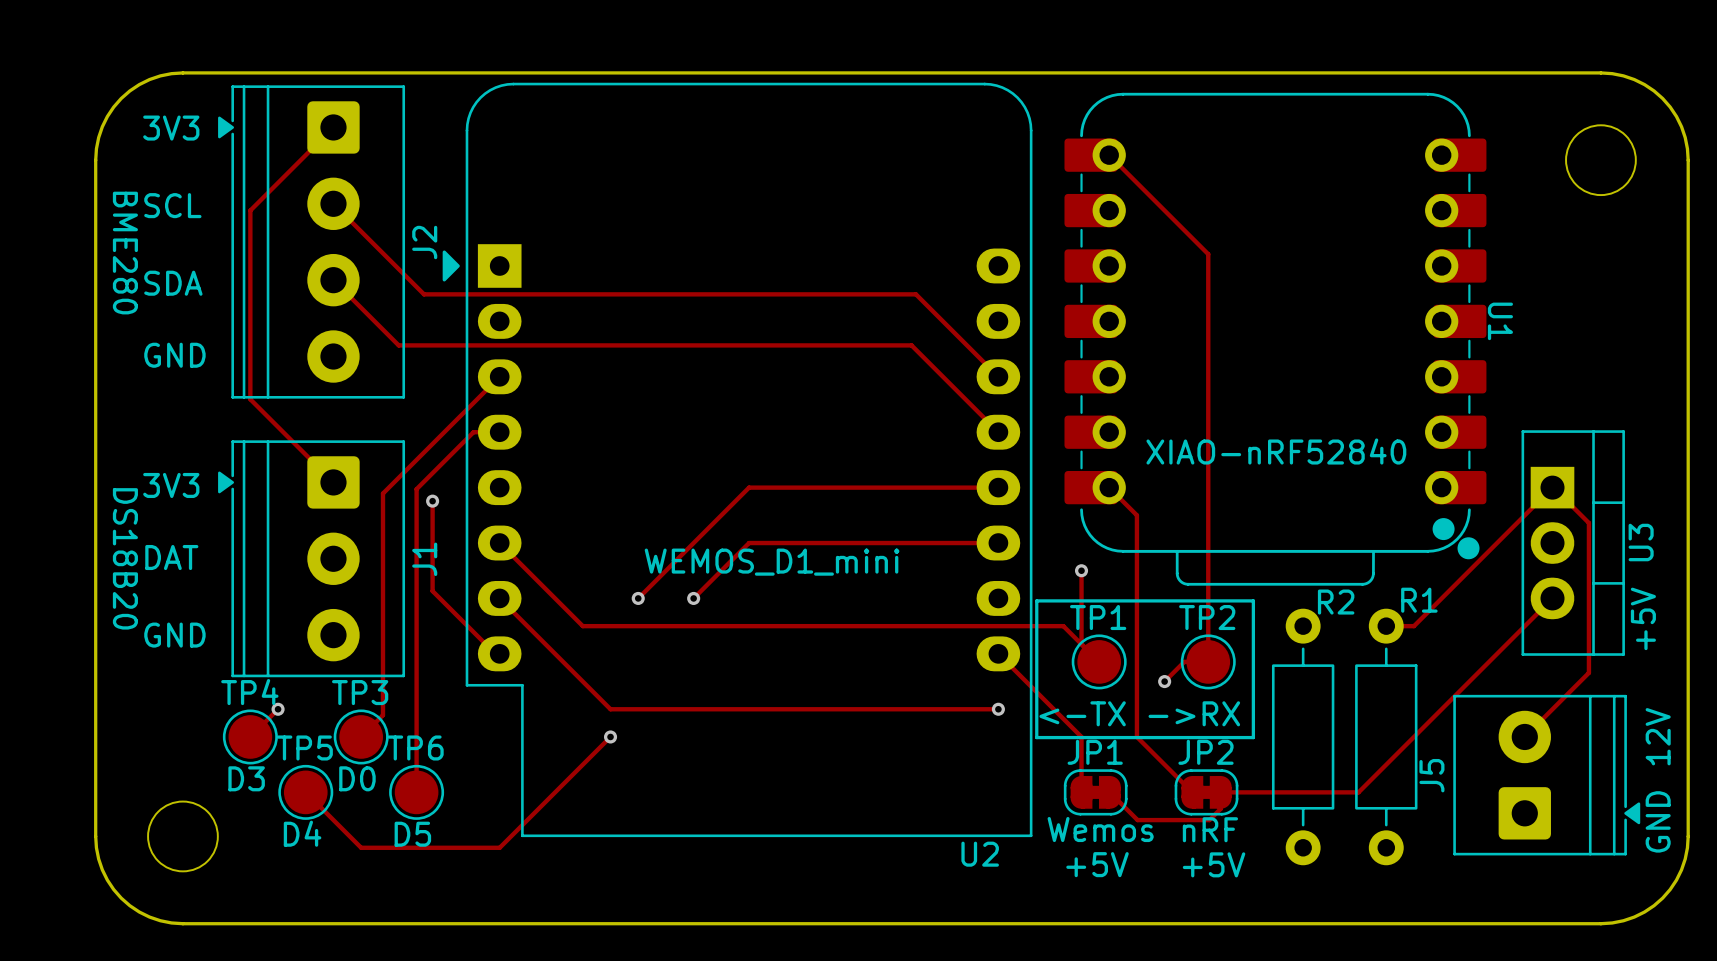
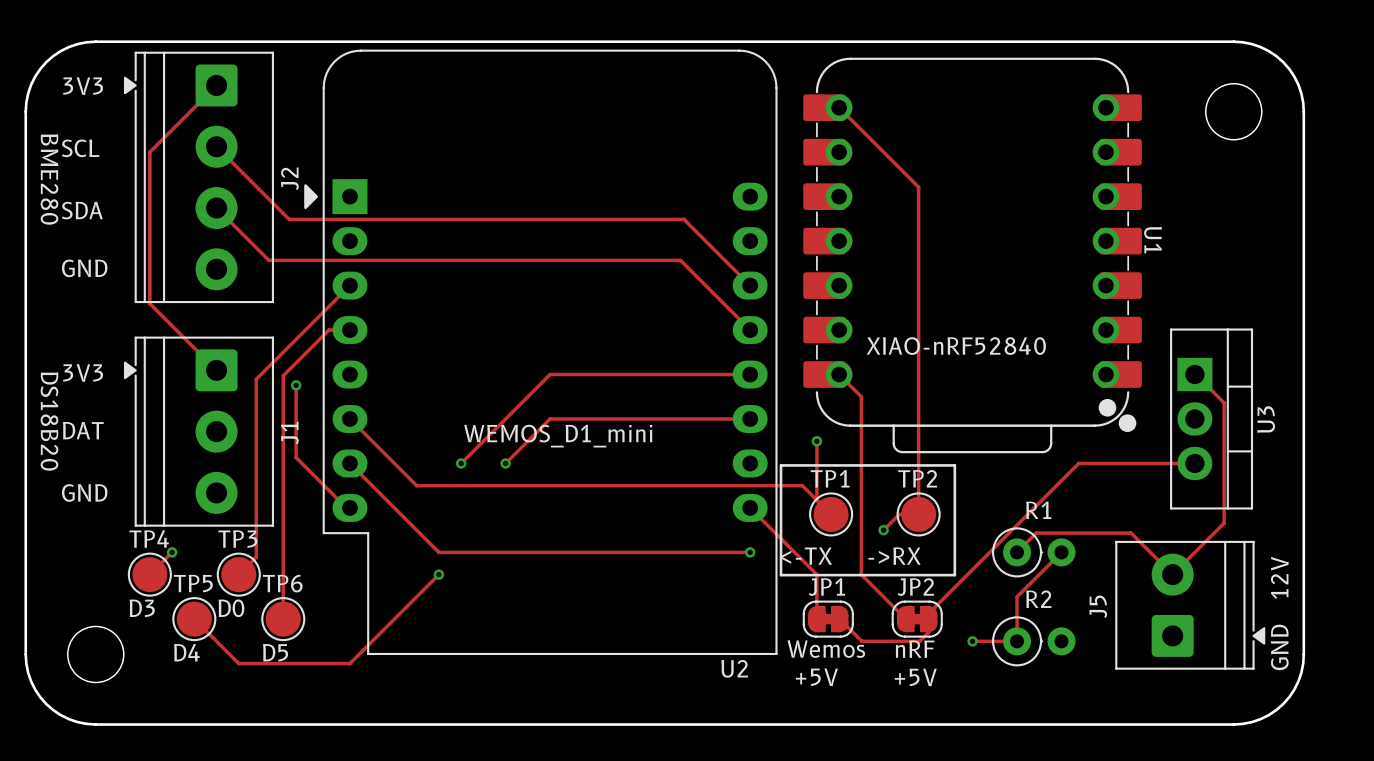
track: (1552, 487) (1413, 626) (1386, 626) -> none
track: (1552, 598) (1358, 792) (1220, 792) -> (1194, 463) (1078, 463) (928, 613) (928, 619)
R1 name position: R1 (1419, 600) -> R1 (1038, 510)
R2 name position: R2 (1336, 602) -> R2 (1038, 599)
R2 footprint: [1271, 608, 1335, 866] -> [991, 616, 1076, 667]
R1 footprint: [1355, 608, 1418, 866] -> [991, 527, 1076, 578]
text: +5V (1643, 618) -> none
track: none -> (1017, 552) (1036, 533) (1131, 533) (1172, 574)
track: none -> (1061, 552) (1017, 596) (1017, 641) (972, 641)
via: none -> (972, 641)

